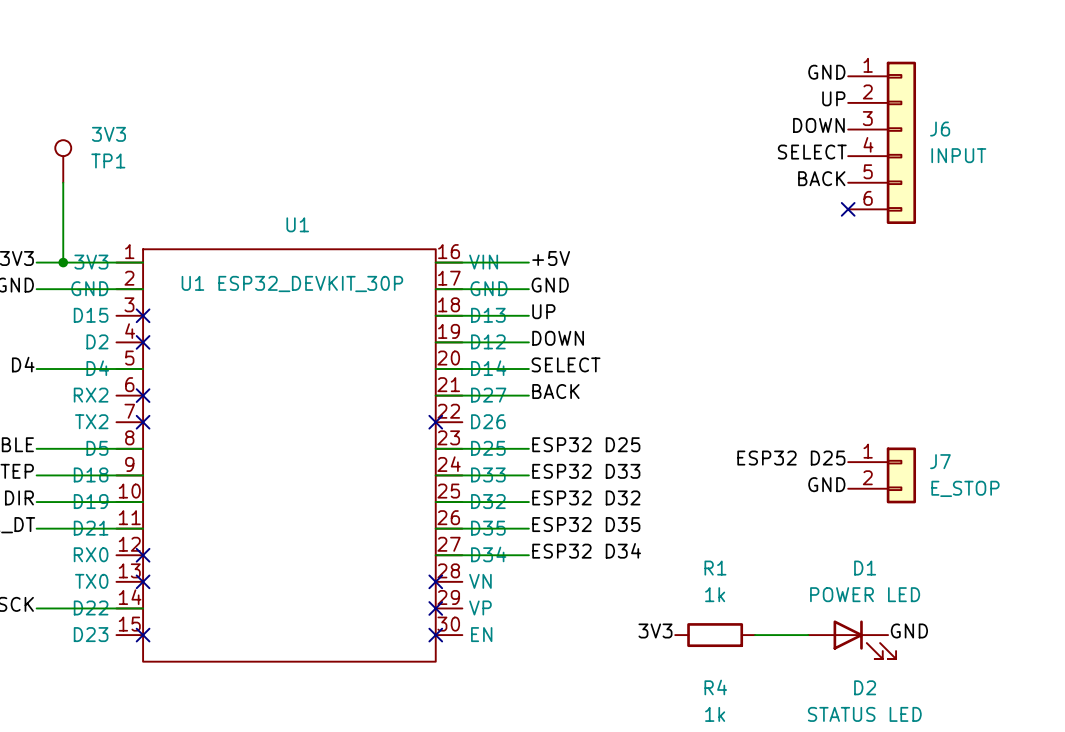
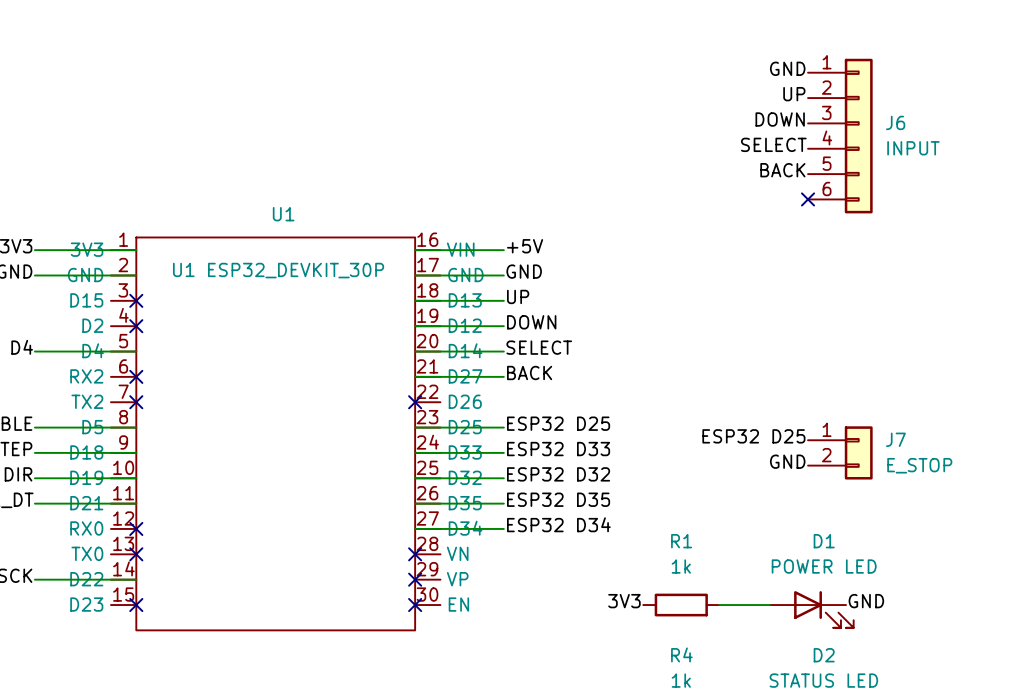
3V3: TP1 (63, 161) -> none
wire: (63, 182) (63, 262) -> none
junction: (63, 262) -> none

